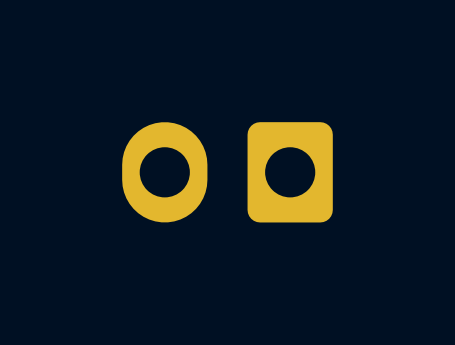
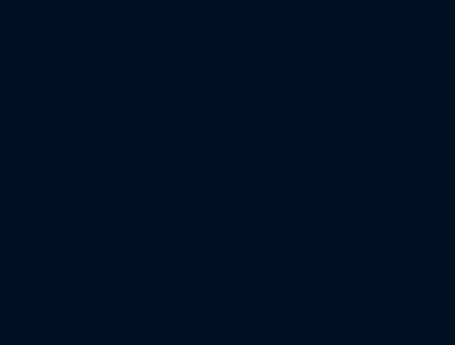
part: (227, 172) -> none

